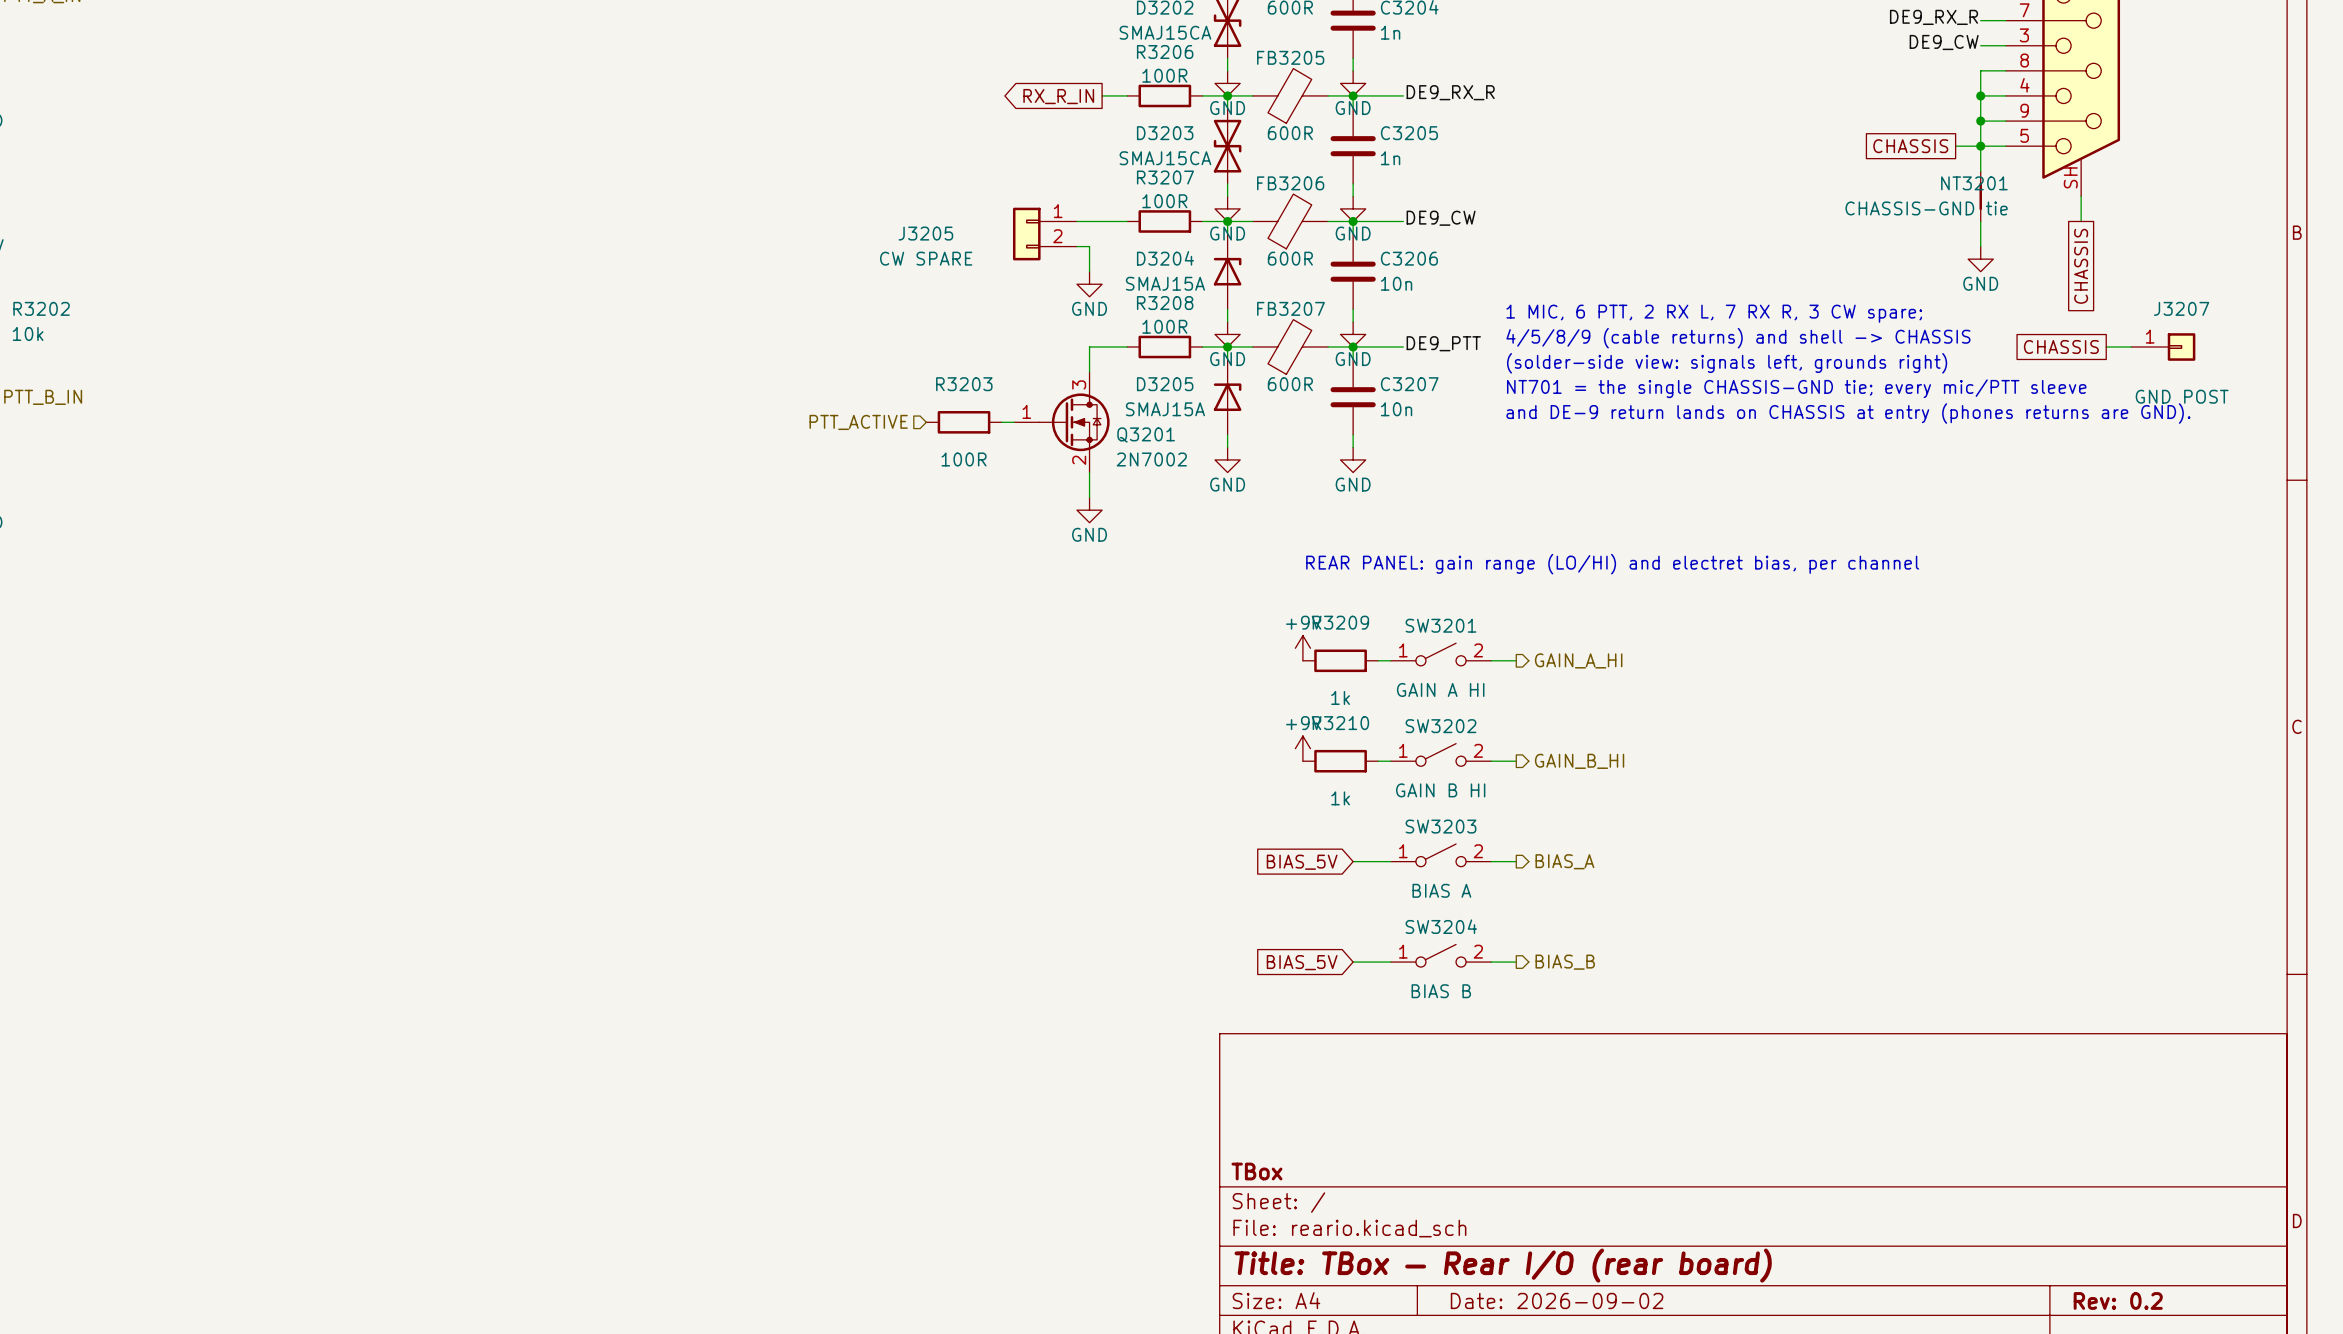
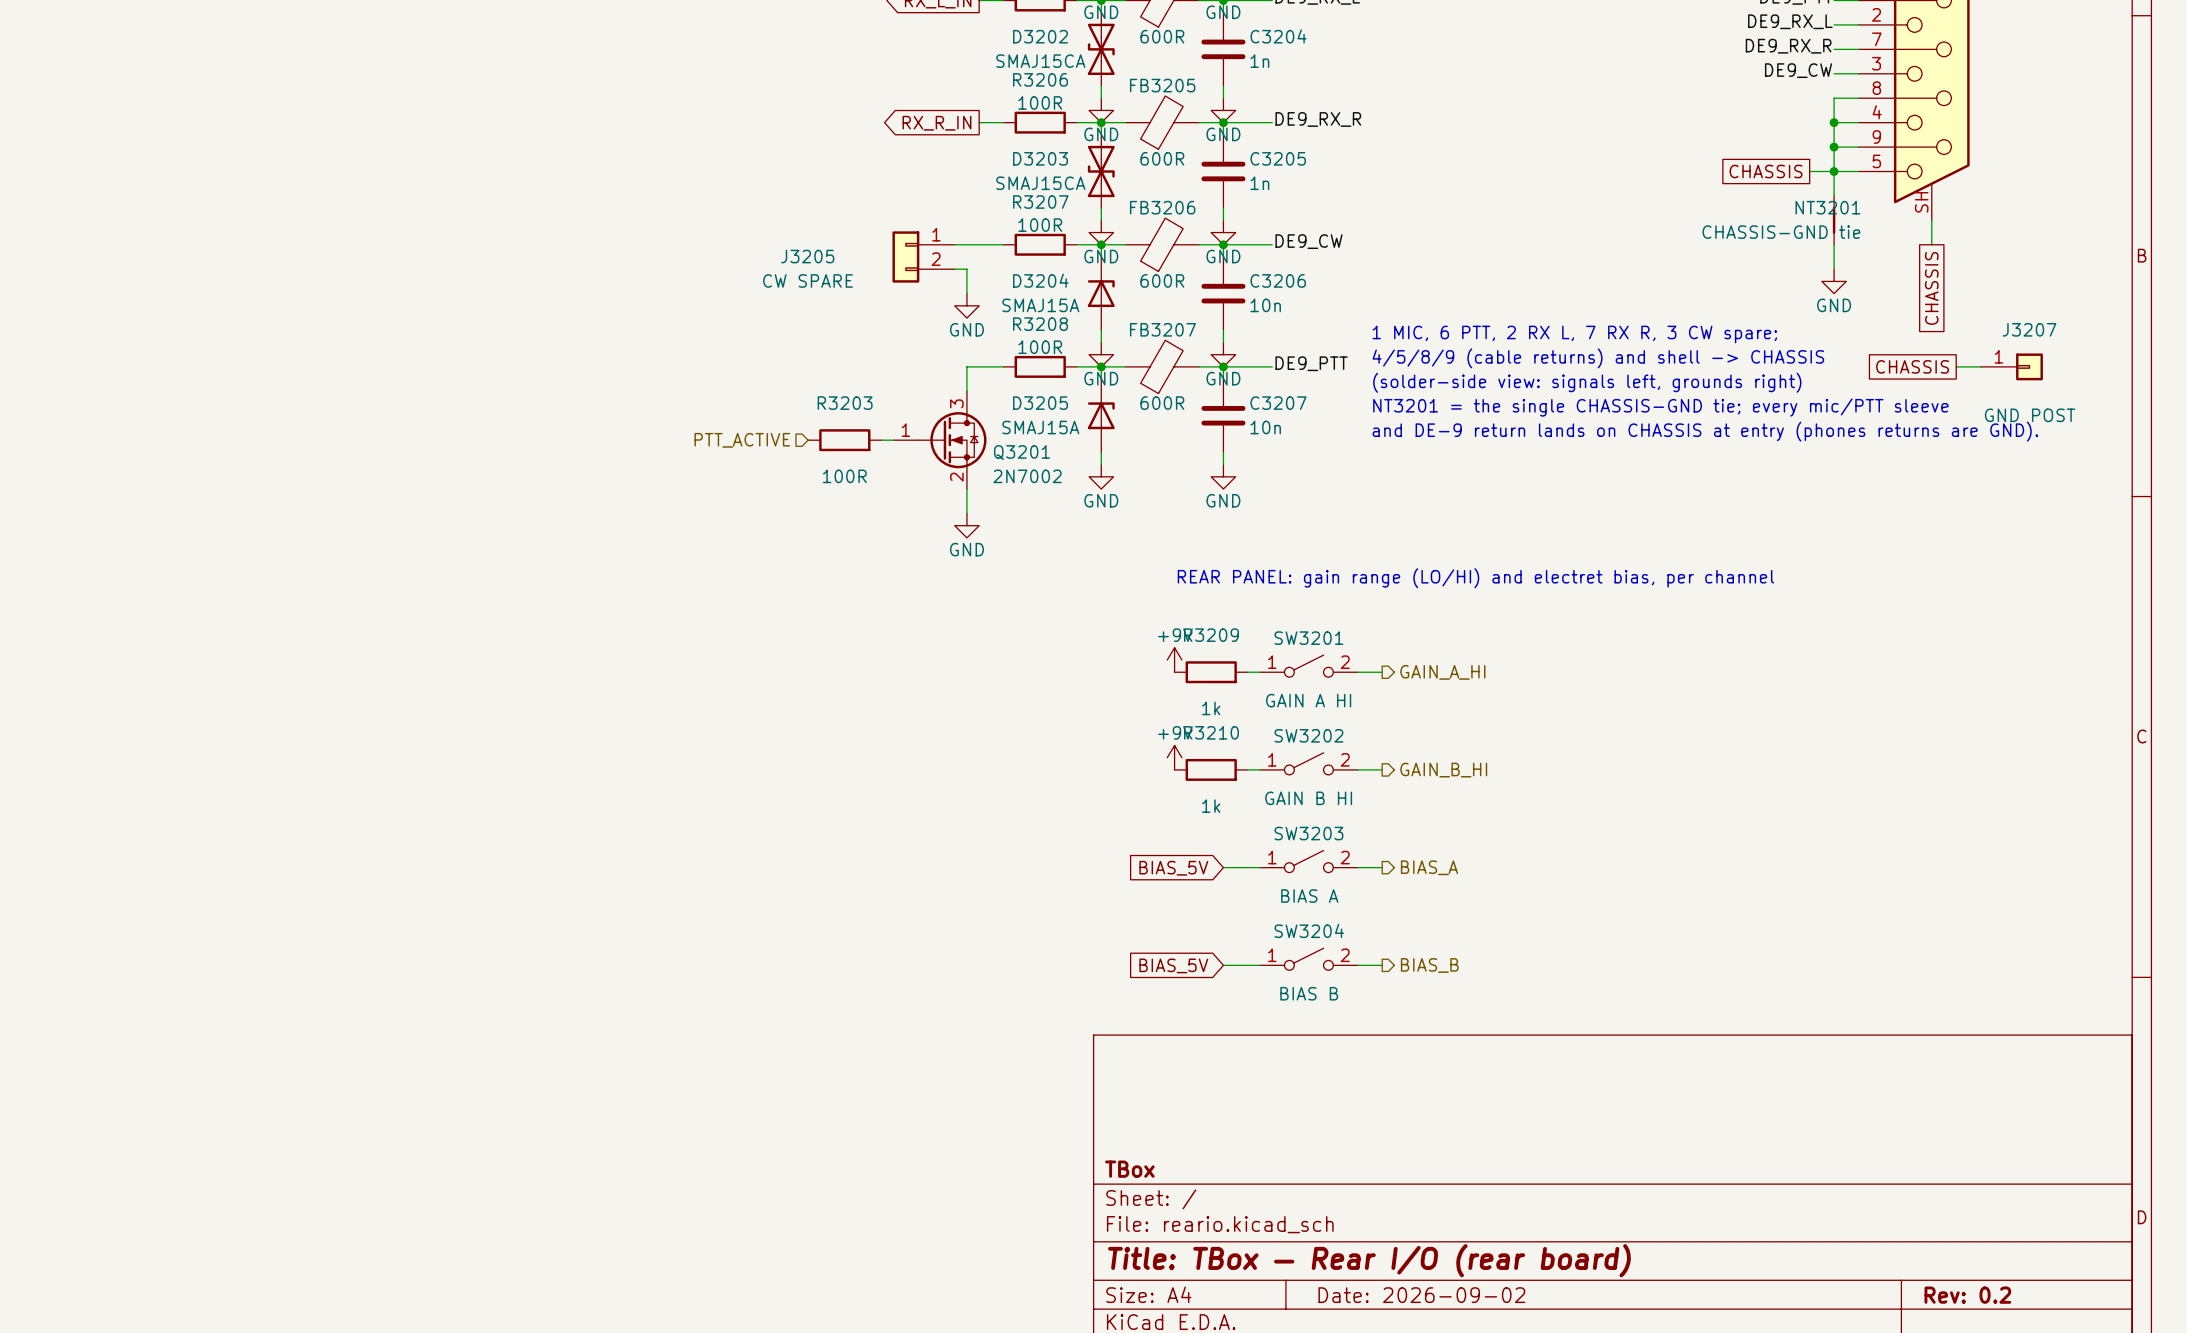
text: NT701 = the single CHASSIS-GND tie; every mic/PTT sleeve (1796, 388) -> NT3201 = the single CHASSIS-GND tie; every mic/PTT sleeve (1660, 407)

